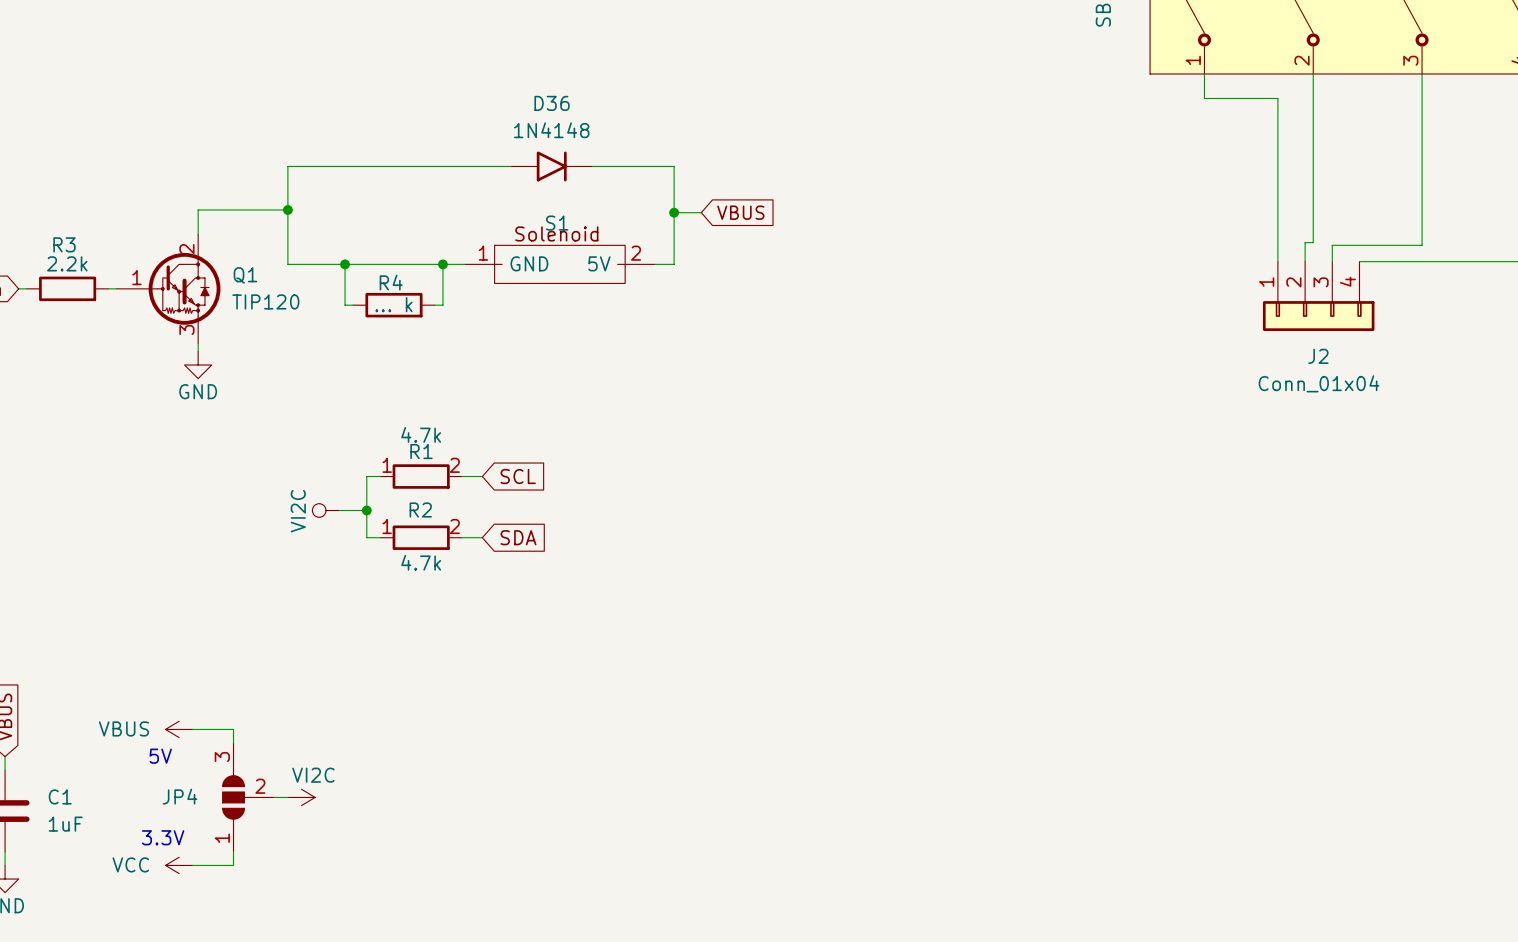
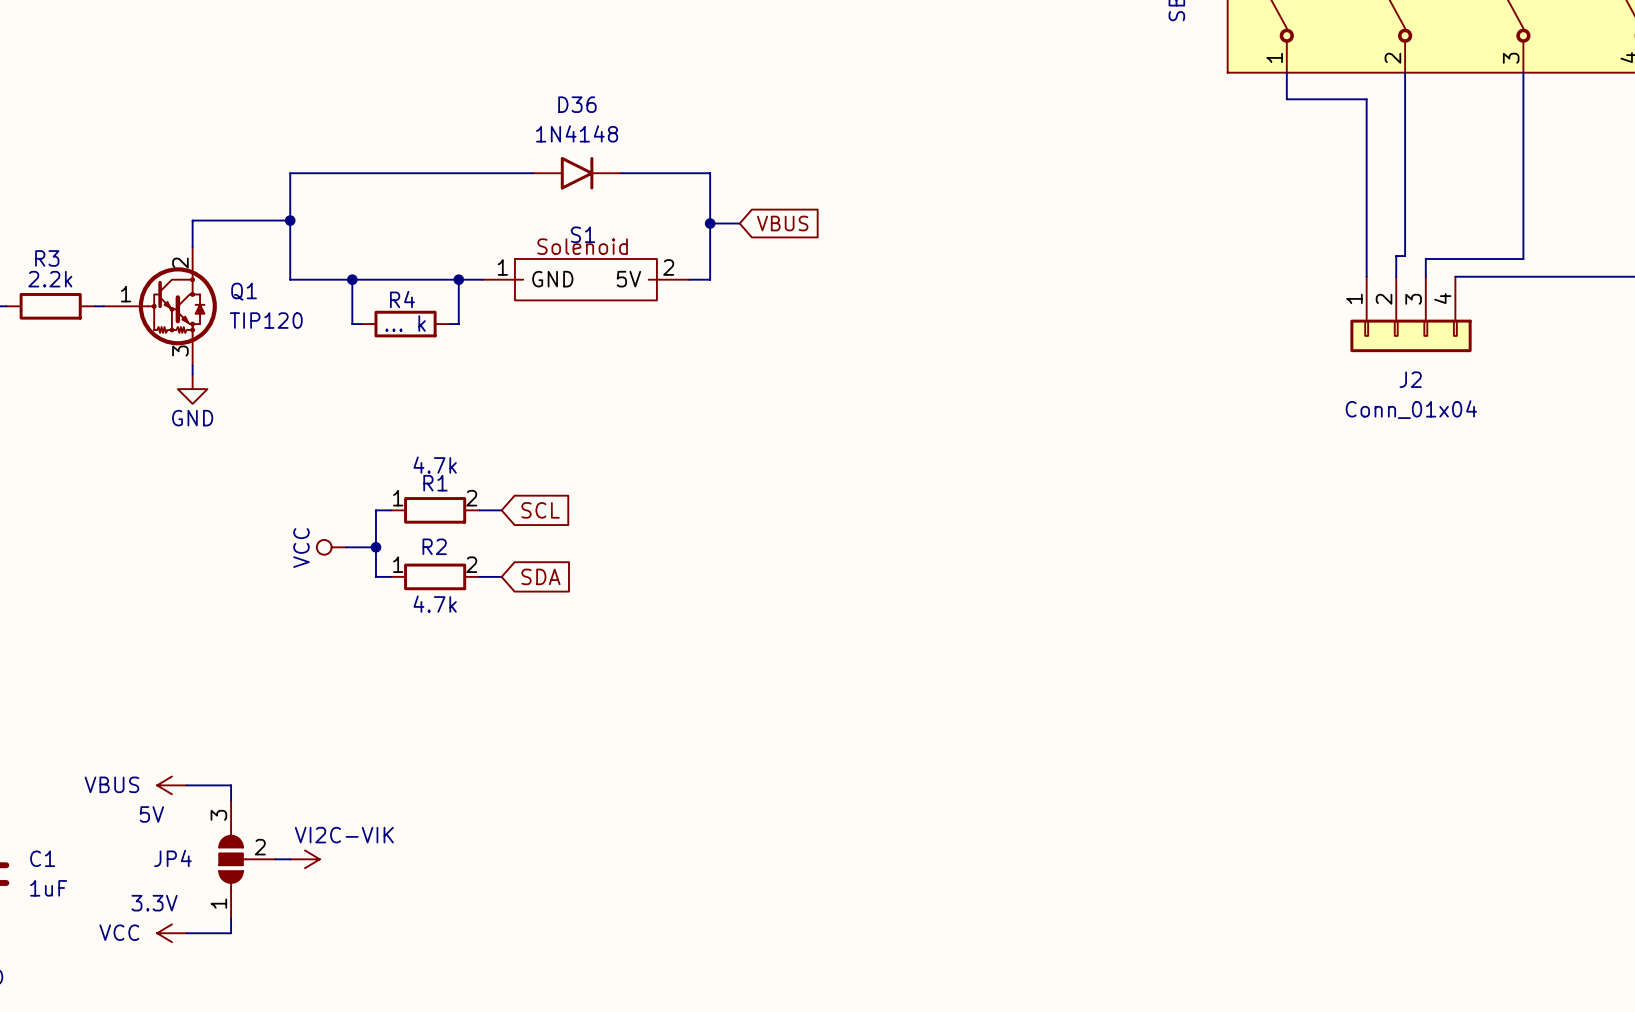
power symbol: VI2C (325, 510) -> VCC (331, 547)
power symbol: VI2C (301, 797) -> VI2C-VIK (305, 859)

